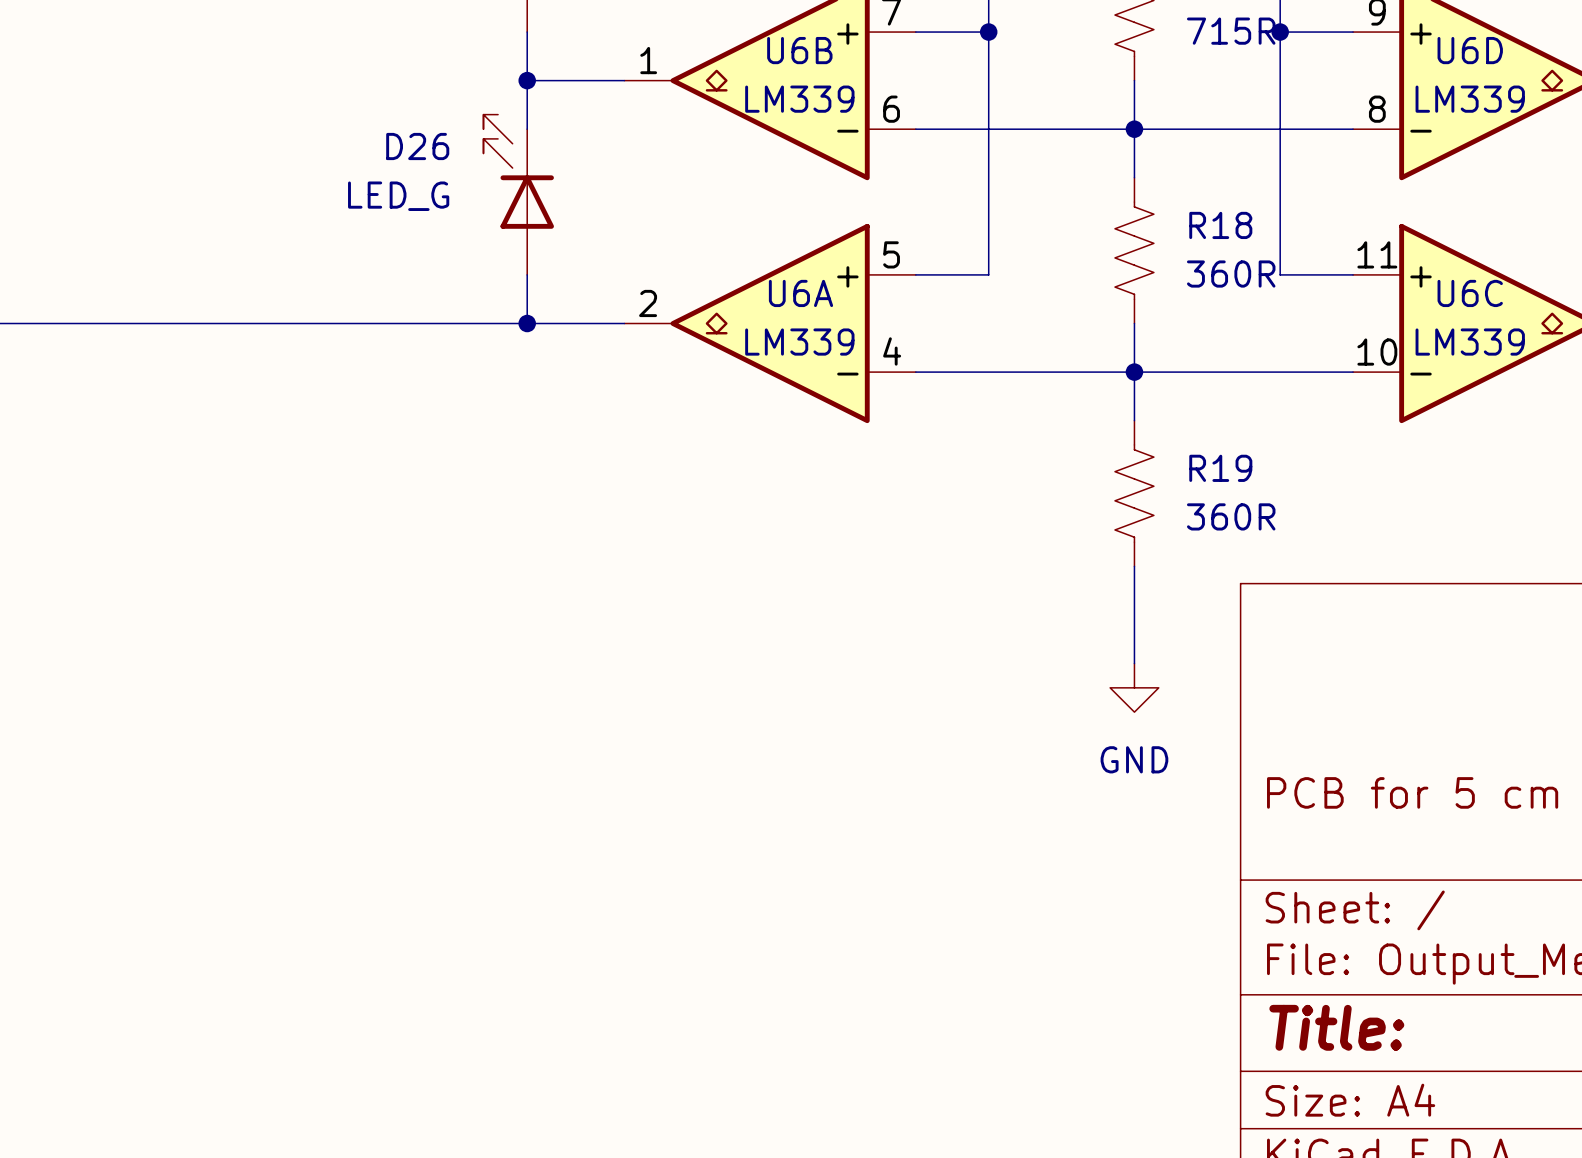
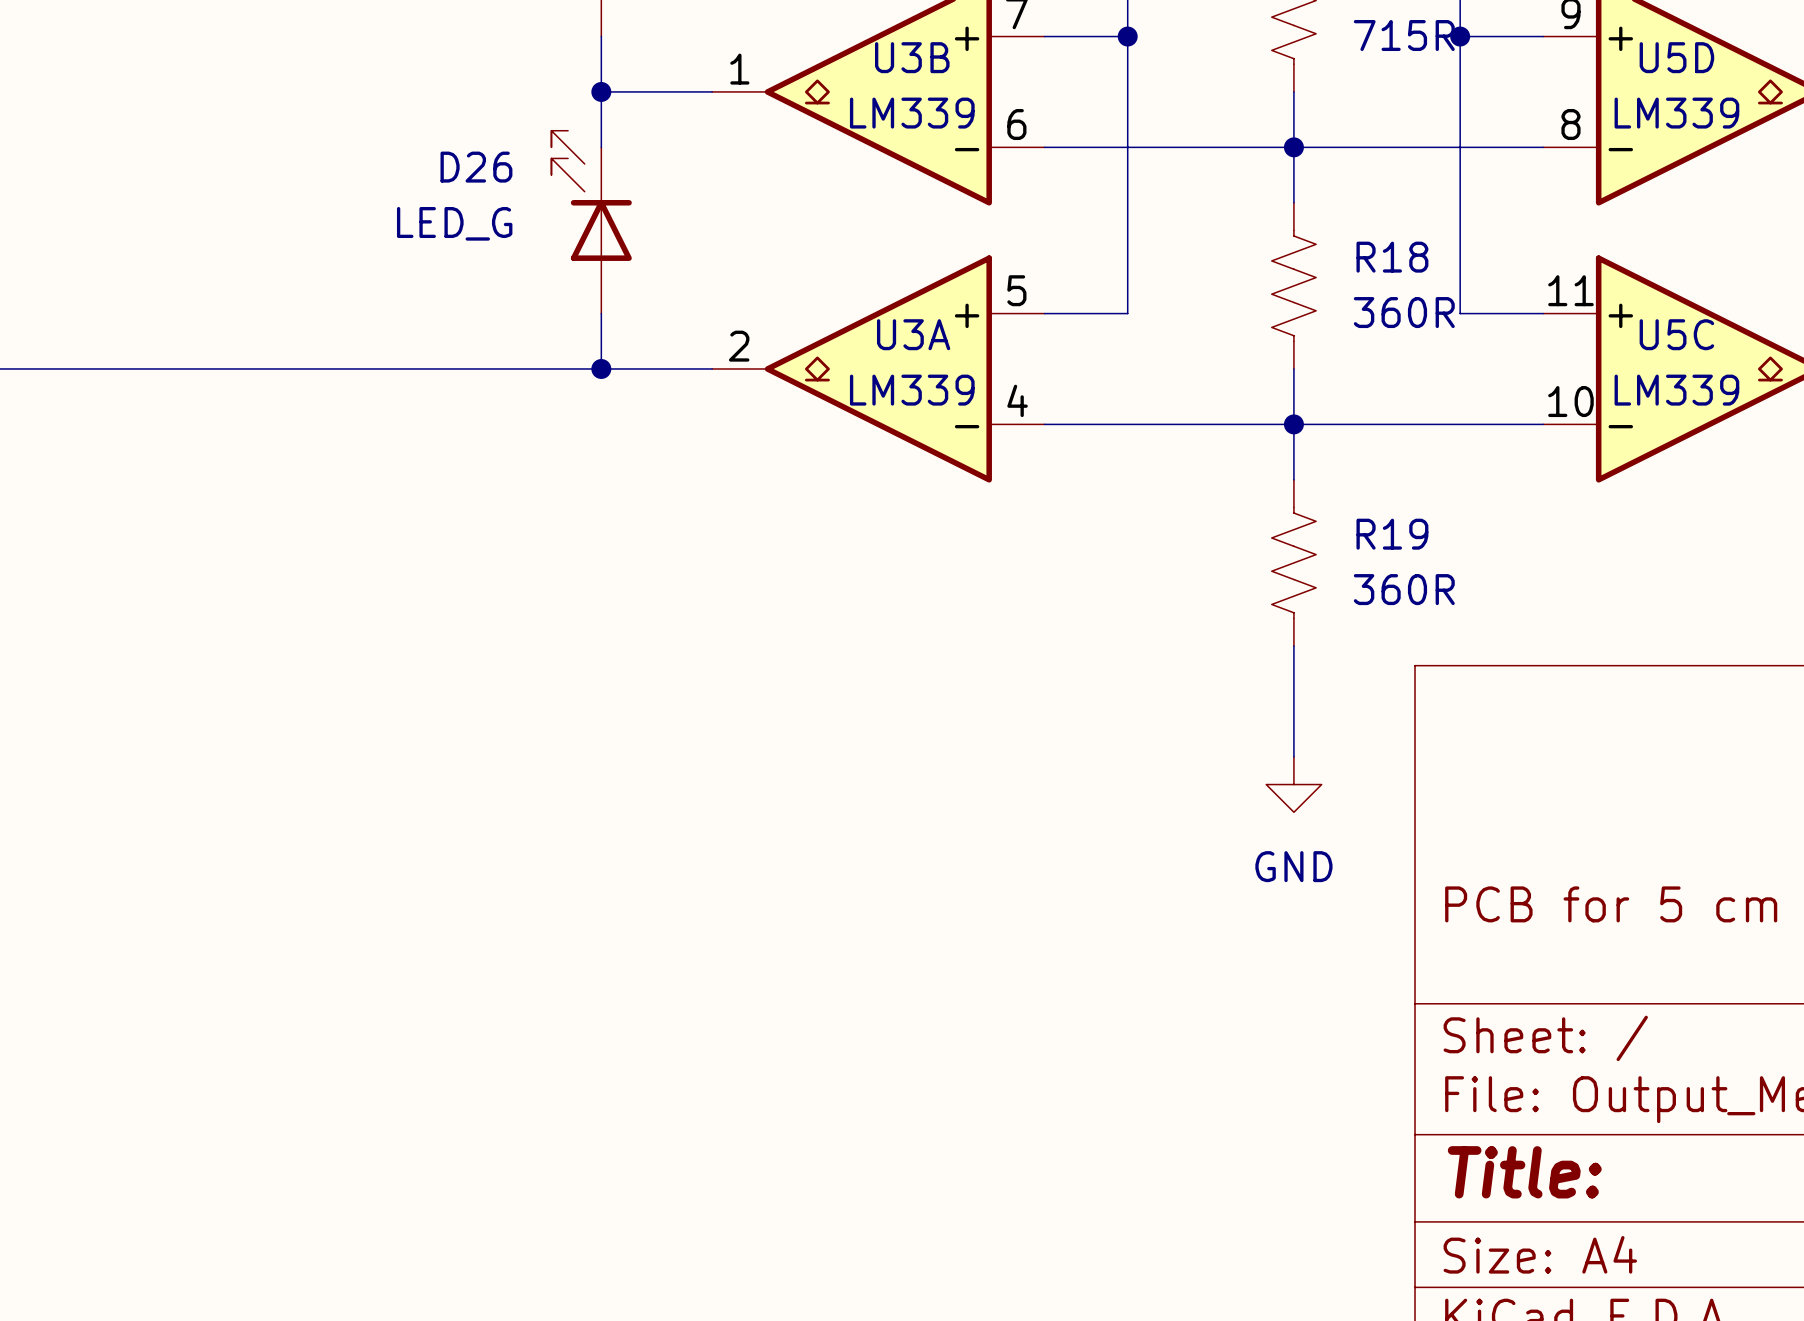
U6B name: U6B (799, 50) -> U3B (912, 57)
U6D name: U6D (1470, 50) -> U5D (1676, 57)
U6A name: U6A (800, 293) -> U3A (913, 334)
U6C name: U6C (1470, 293) -> U5C (1676, 334)

